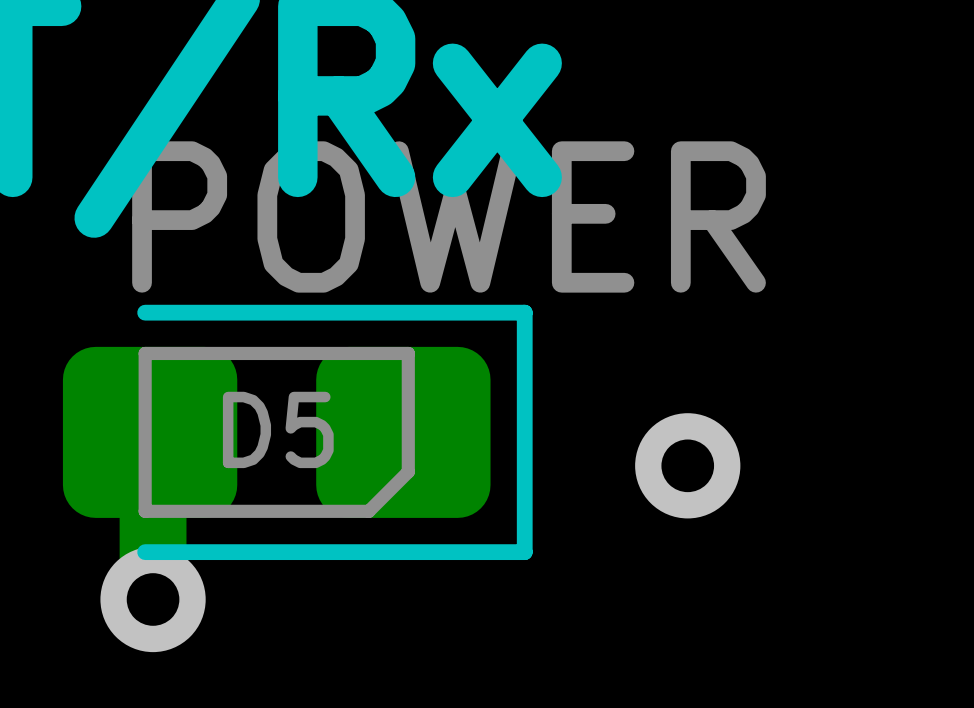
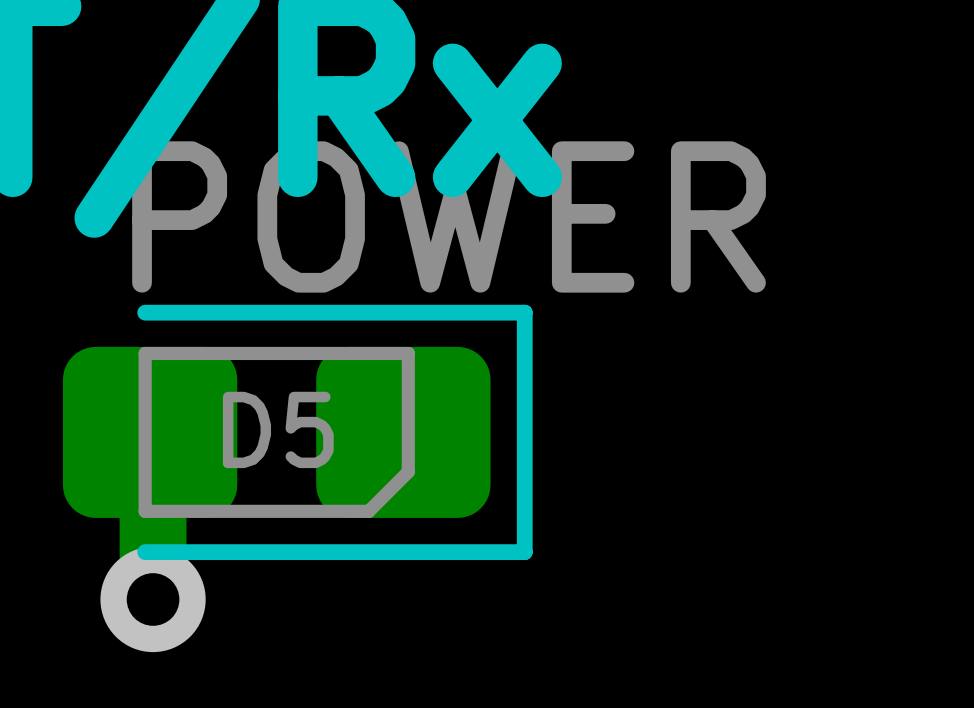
via: (687, 465) -> none

